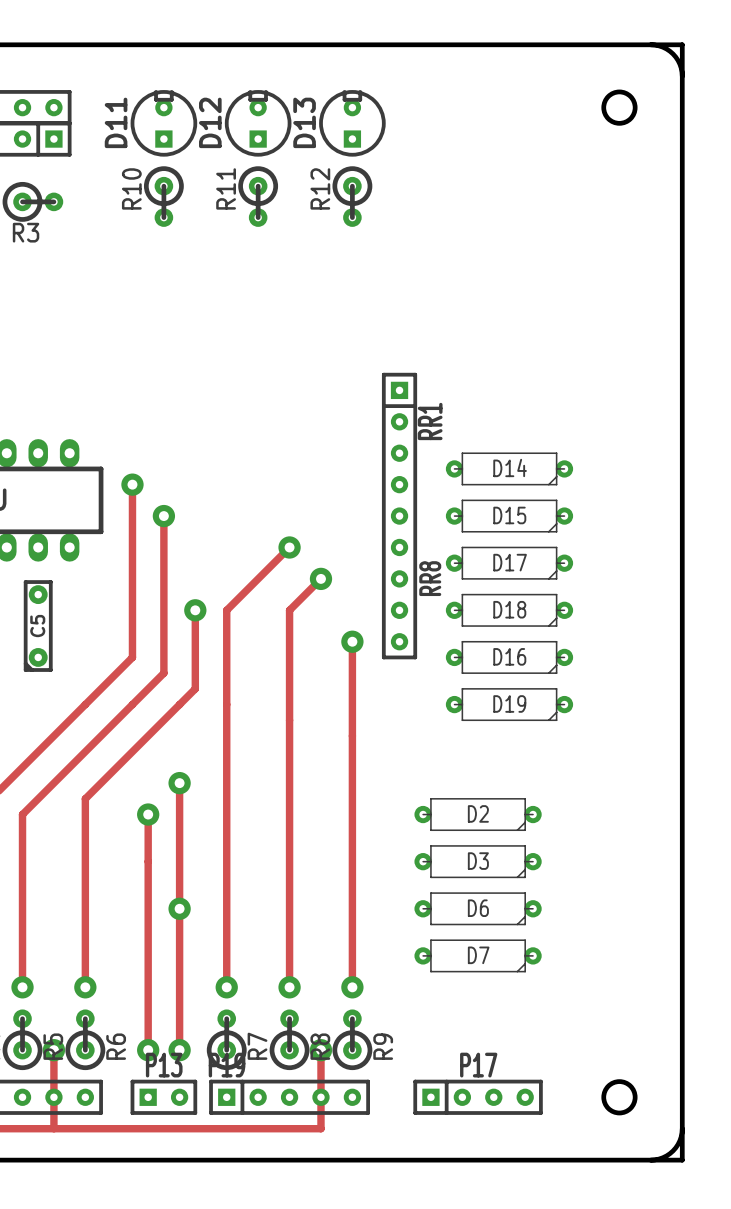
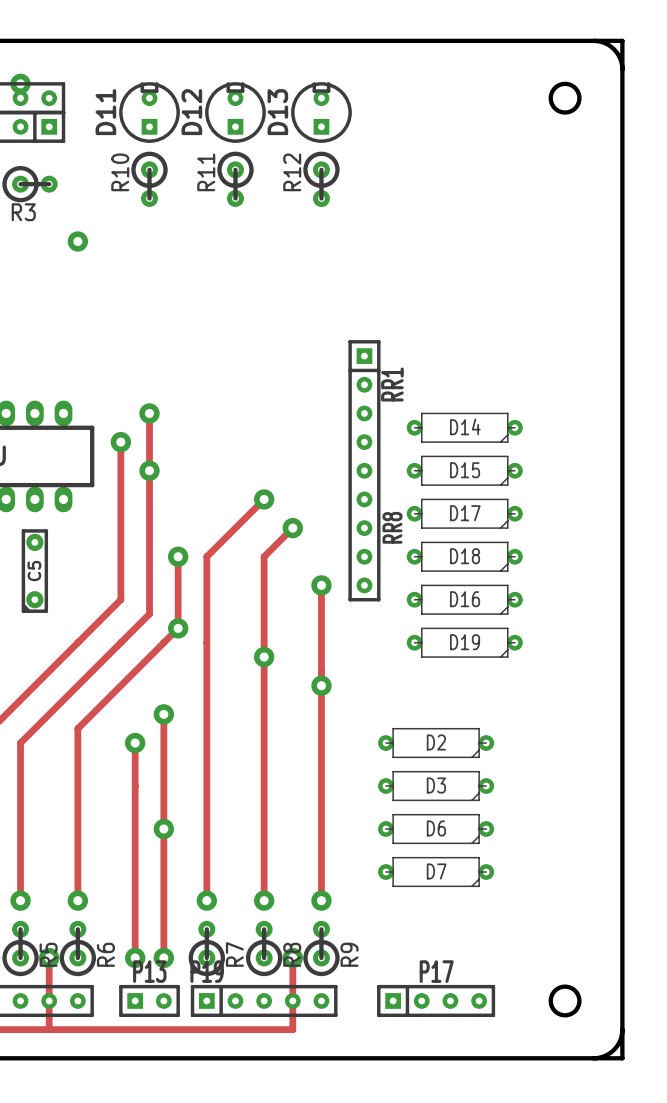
via: none -> (20, 83)
via: none -> (77, 241)
track: none -> (149, 413) (149, 470)
via: none -> (149, 413)
via: none -> (178, 628)
via: none -> (264, 657)
via: none -> (321, 685)

